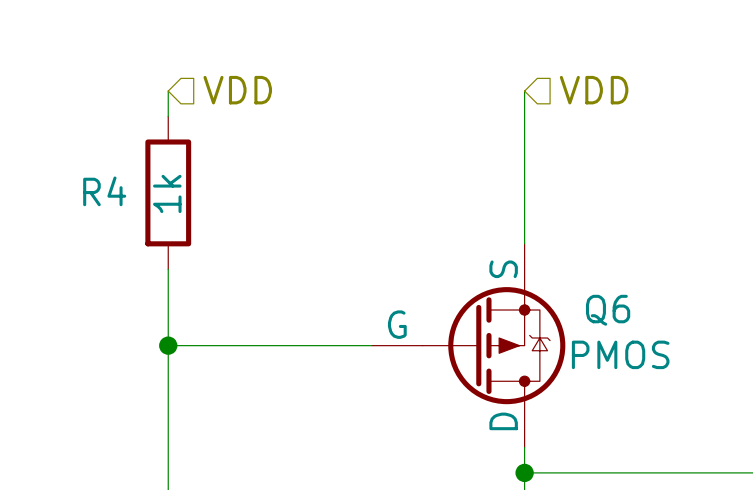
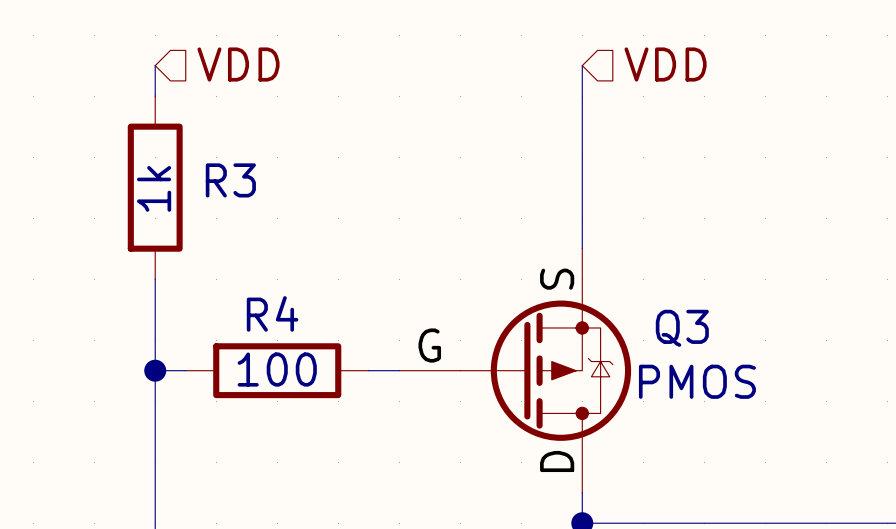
R4 name: R4 (104, 191) -> R3 (230, 180)
Q6 name: Q6 (608, 310) -> Q3 (682, 328)
wire: (193, 345) (346, 345) -> none
R4: none -> 100 (277, 370)

